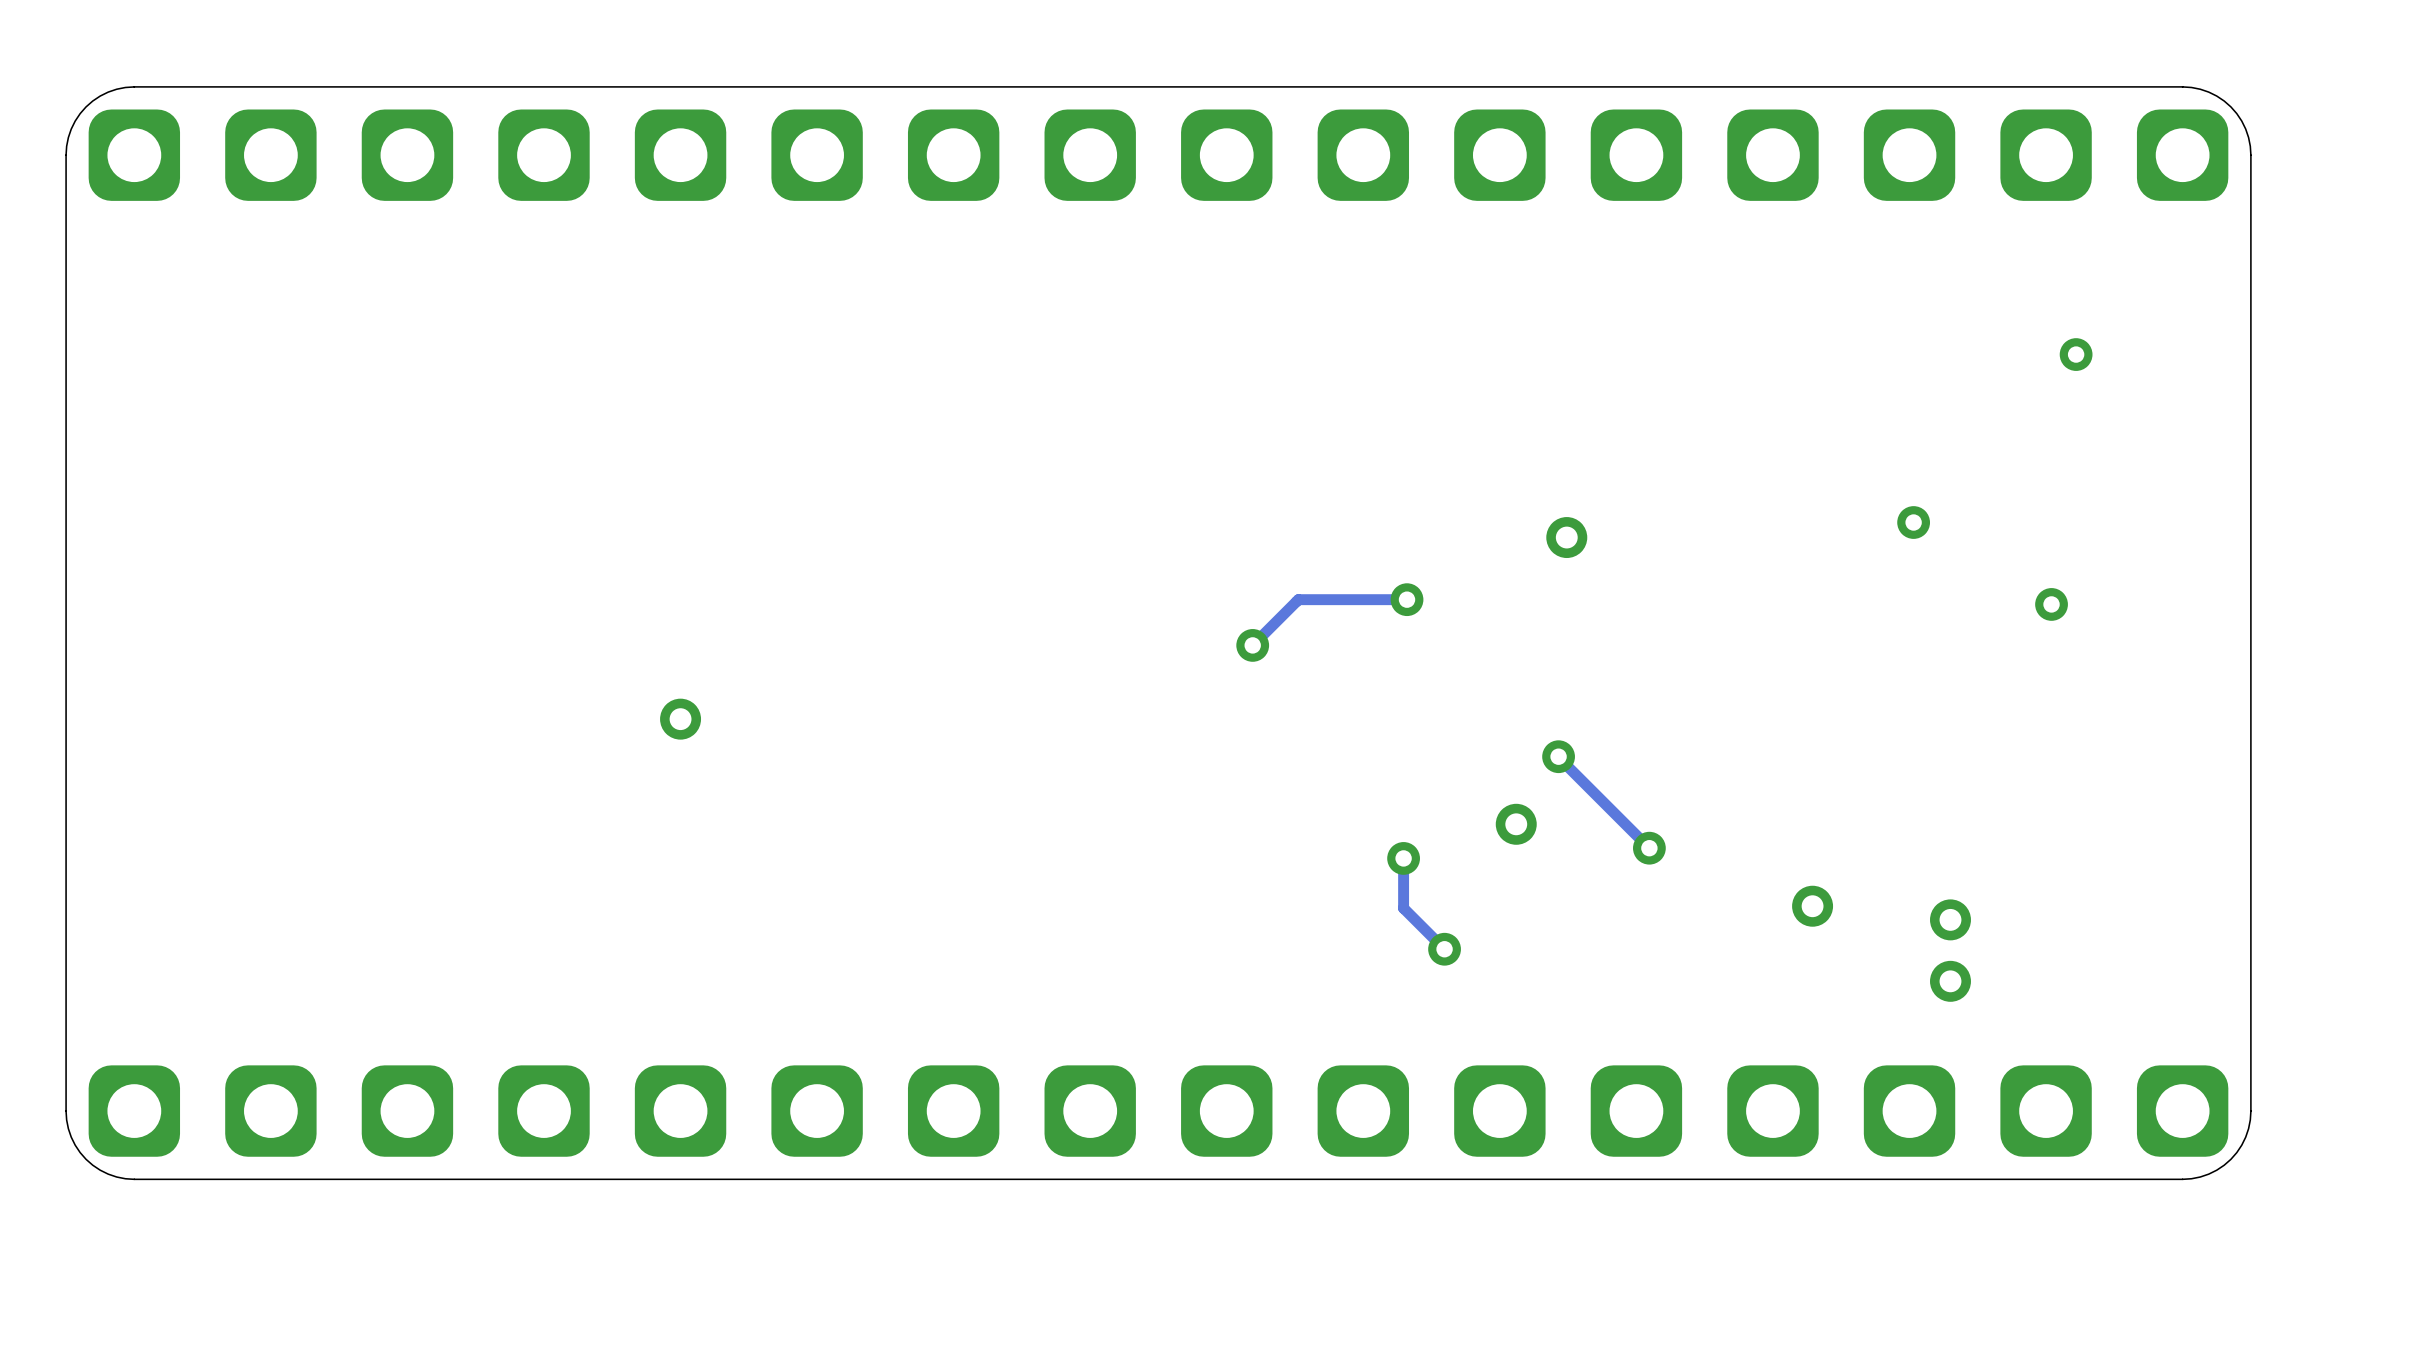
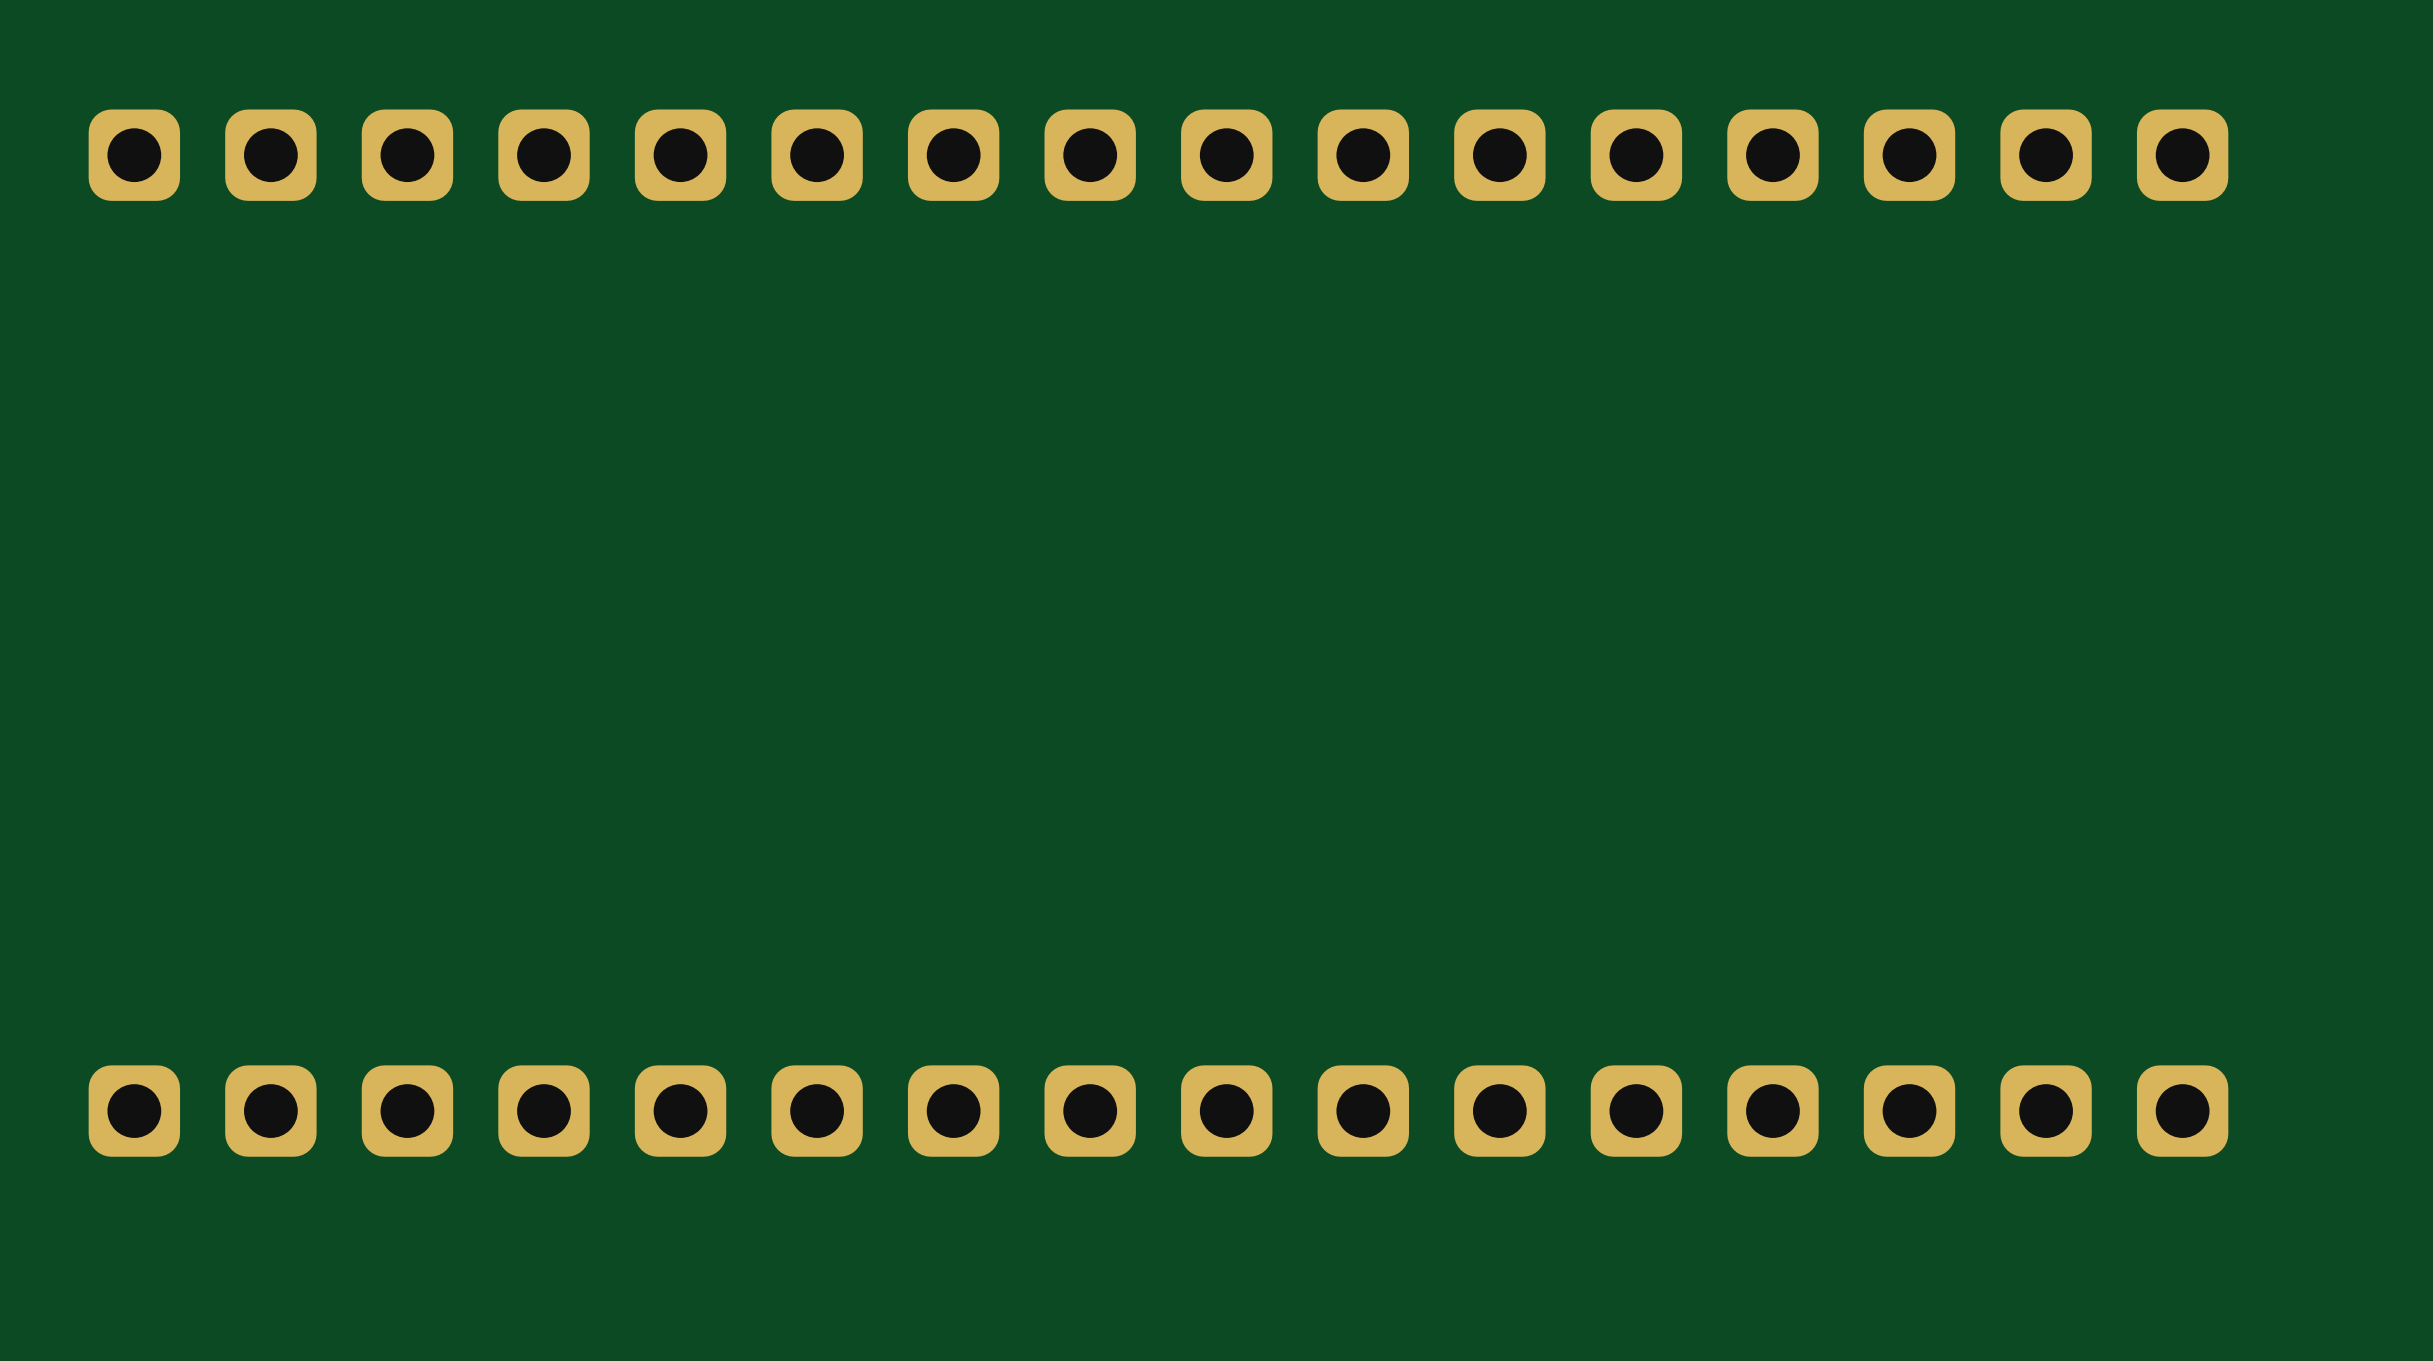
board edge: (2182, 86) (134, 86) (116, 89) (100, 96) (86, 106) (75, 121) (68, 137) (66, 155) (66, 1111) (68, 1128) (75, 1145) (86, 1159) (100, 1170) (116, 1177) (134, 1179) (2182, 1179) (2200, 1177) (2216, 1170) (2230, 1159) (2241, 1145) (2248, 1128) (2250, 1111) (2250, 155) (2245, 129) (2230, 106) (2208, 92) (2182, 86) -> none
via: (2076, 354) -> none
via: (1913, 522) -> none
via: (1566, 537) -> none
track: (1407, 599) (1298, 599) (1252, 645) -> none
via: (1407, 599) -> none
via: (2051, 604) -> none
via: (1252, 645) -> none
via: (680, 719) -> none
via: (1558, 756) -> none
track: (1558, 757) (1649, 848) -> none
via: (1516, 824) -> none
via: (1649, 848) -> none
track: (1403, 858) (1403, 908) (1444, 949) -> none
via: (1403, 858) -> none
via: (1812, 906) -> none
via: (1950, 919) -> none
via: (1444, 949) -> none
via: (1950, 981) -> none

